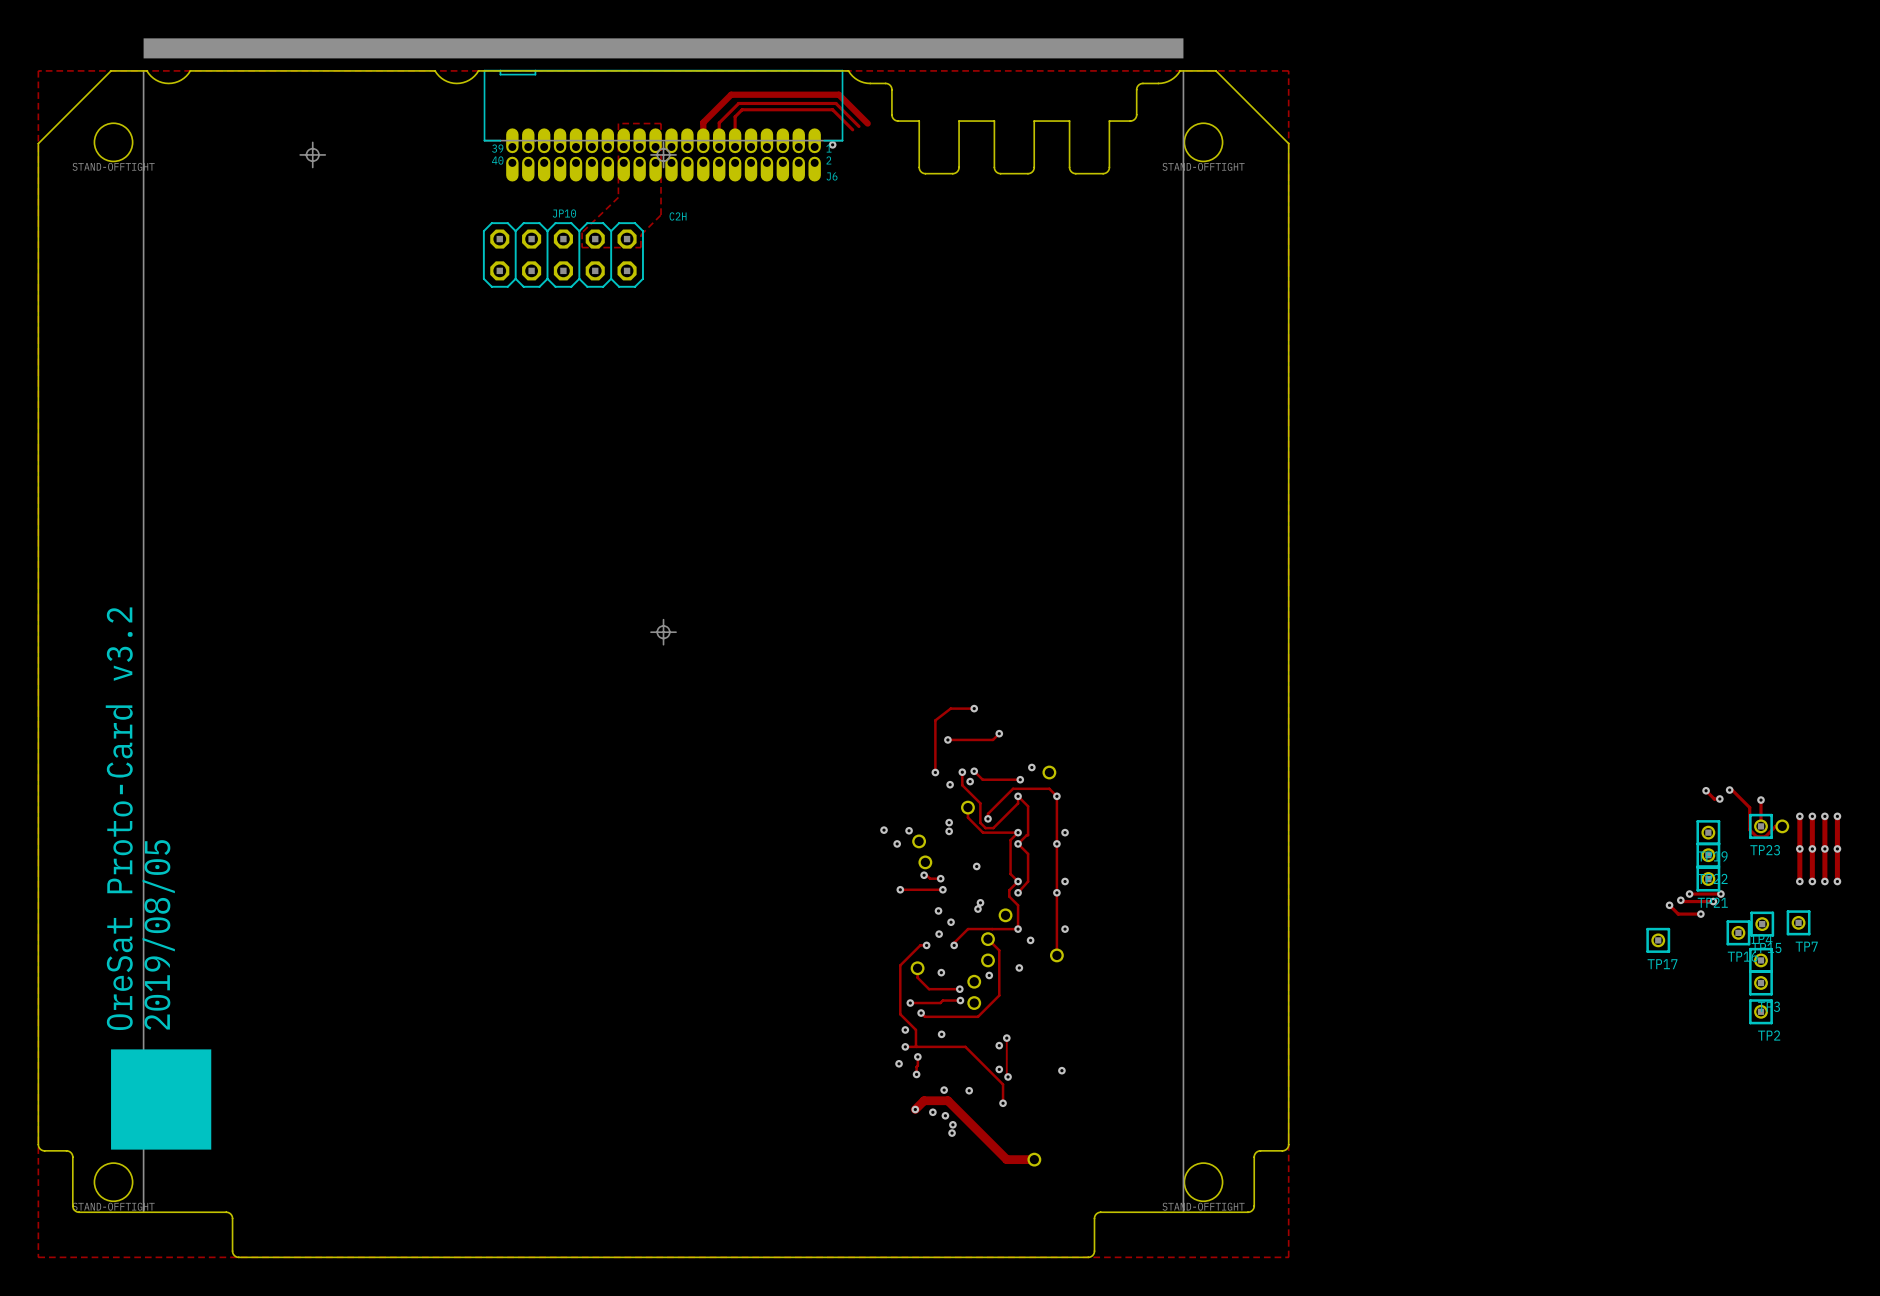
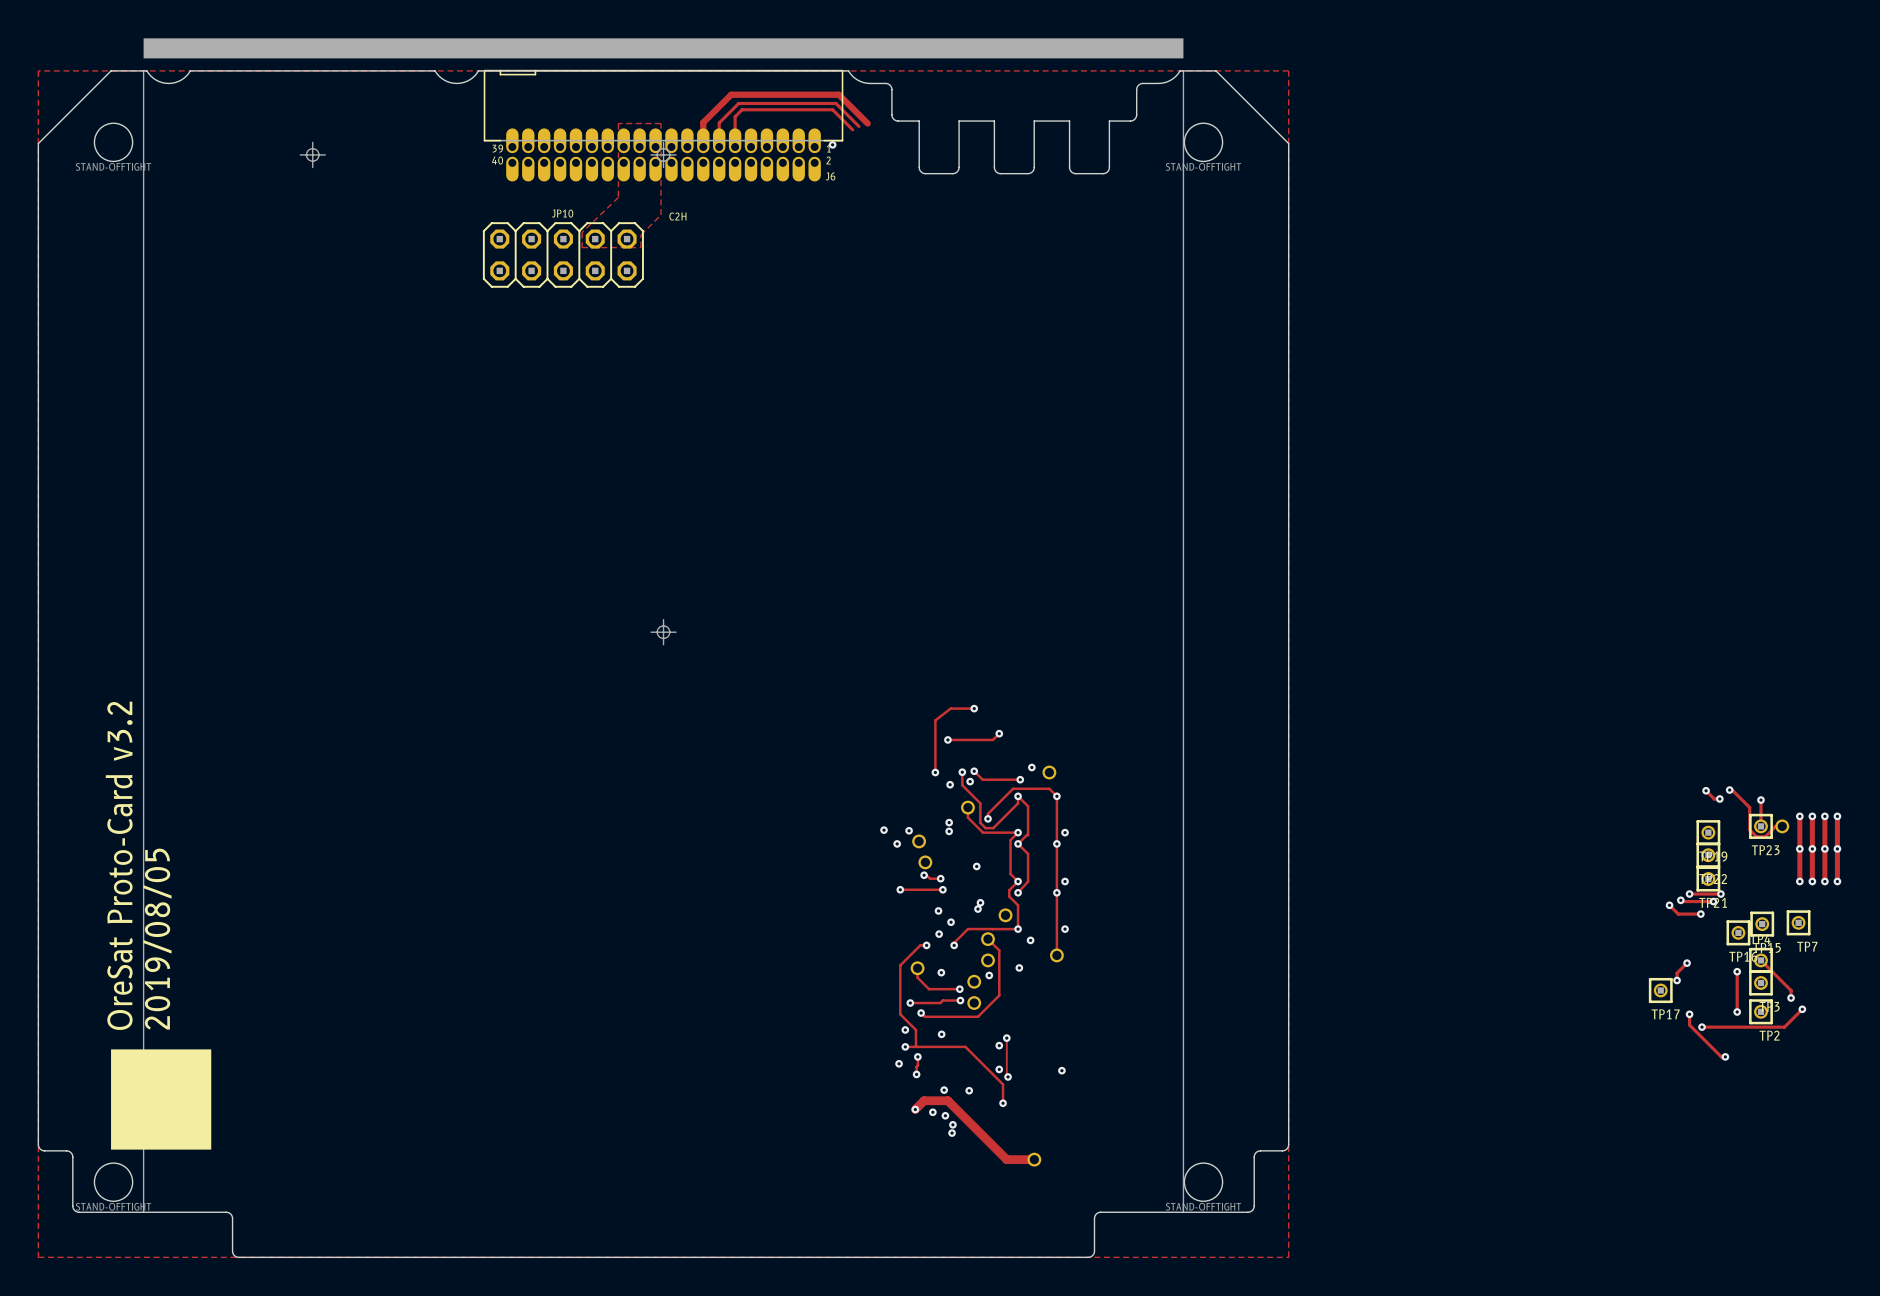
TP17 position: (1658, 940) -> (1660, 990)
track: none -> (1760, 960) (1791, 990) (1791, 998)
track: none -> (1687, 963) (1677, 973) (1677, 980)
via: none -> (1687, 963)
track: none -> (1737, 971) (1737, 1012)
via: none -> (1737, 971)
via: none -> (1677, 980)
via: none -> (1791, 998)
track: none -> (1802, 1009) (1784, 1027) (1701, 1027)
via: none -> (1802, 1009)
via: none -> (1737, 1012)
track: none -> (1689, 1014) (1689, 1025) (1721, 1056) (1725, 1056)
via: none -> (1689, 1014)
via: none -> (1701, 1027)
via: none -> (1725, 1056)

